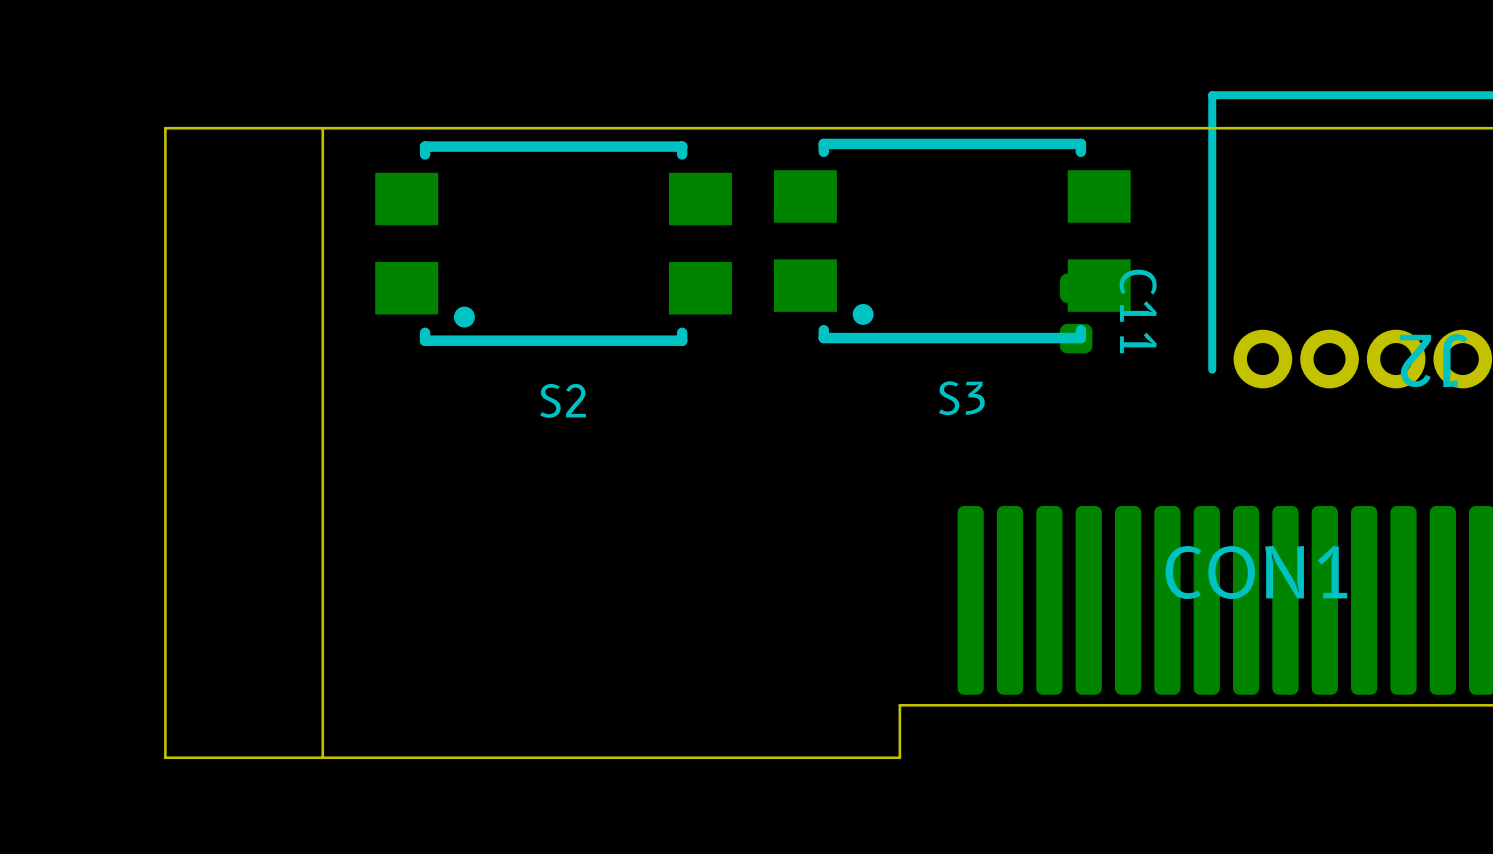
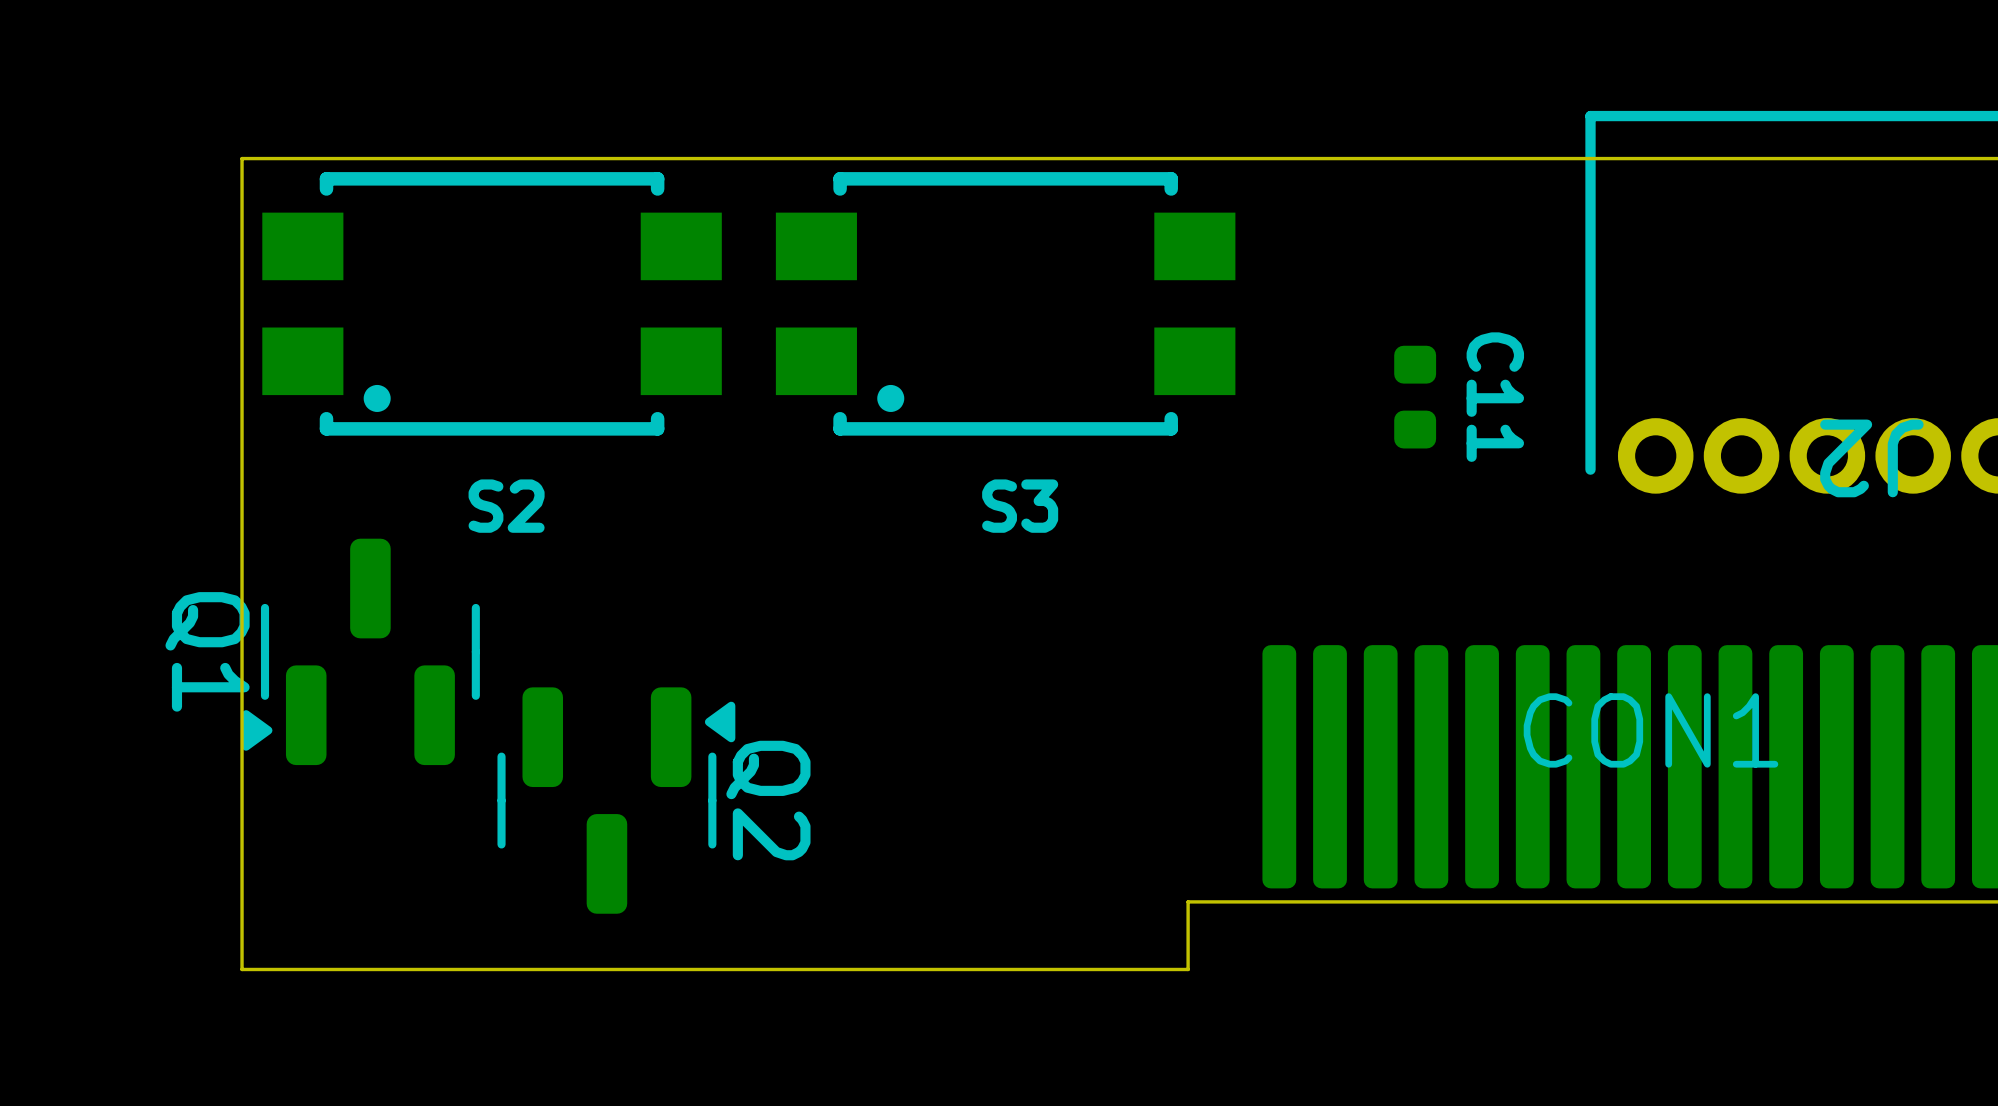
board edge: (322, 128) (322, 757) -> none
S3 position: (952, 241) -> (1005, 303)
S2 position: (553, 243) -> (492, 303)
Q1: none -> (360, 651)
Q2: none -> (616, 800)

